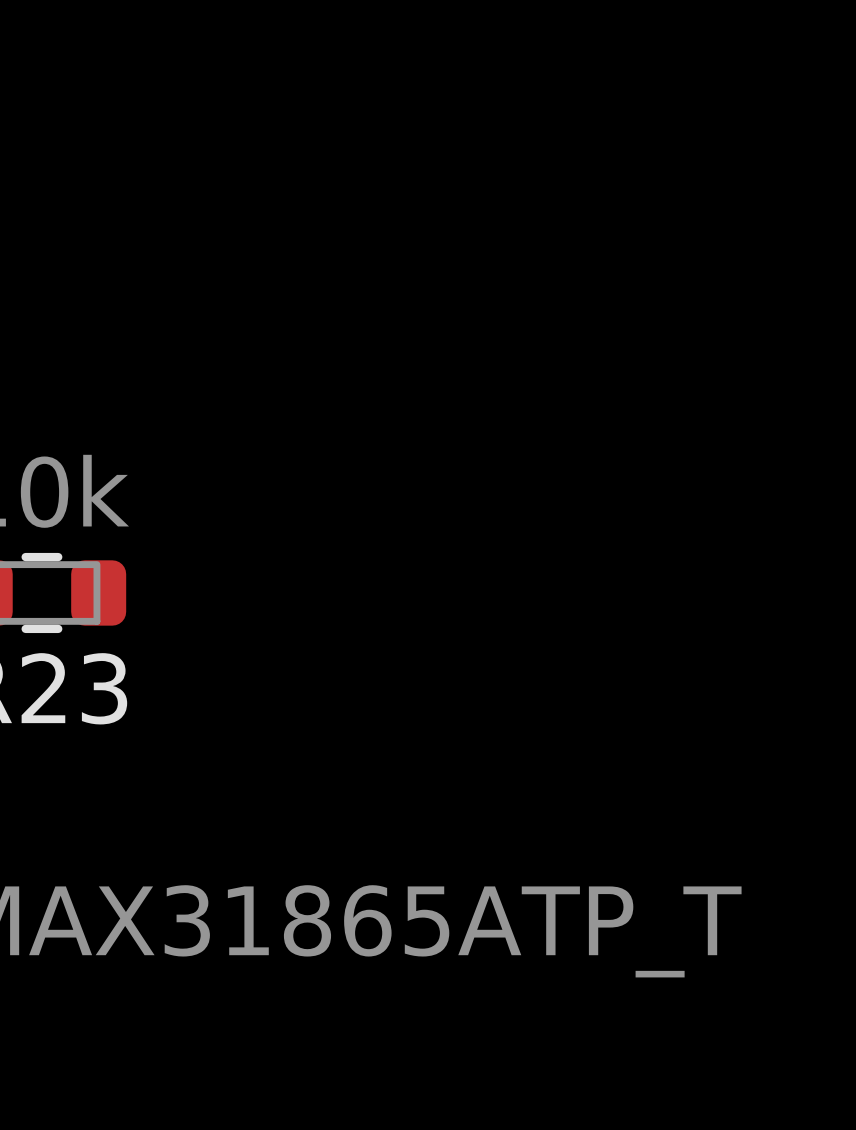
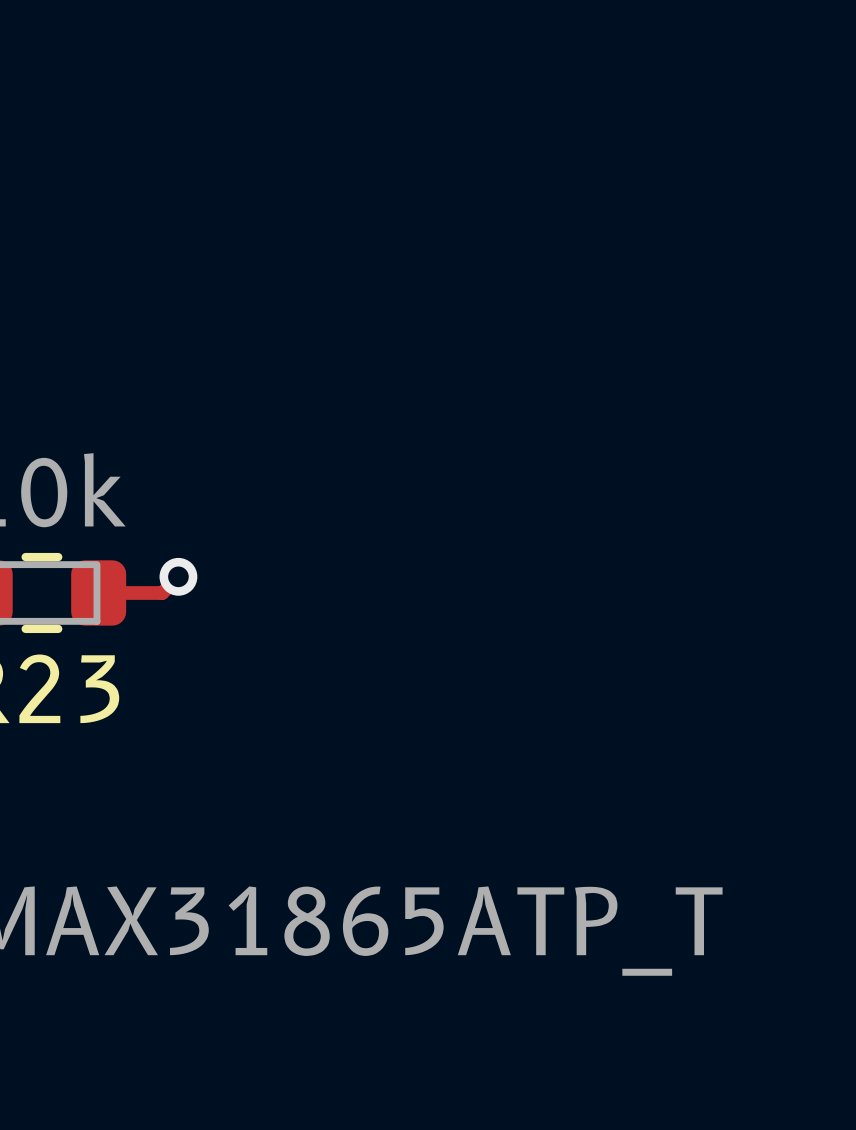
track: none -> (178, 576) (162, 592) (98, 592)
via: none -> (178, 576)

